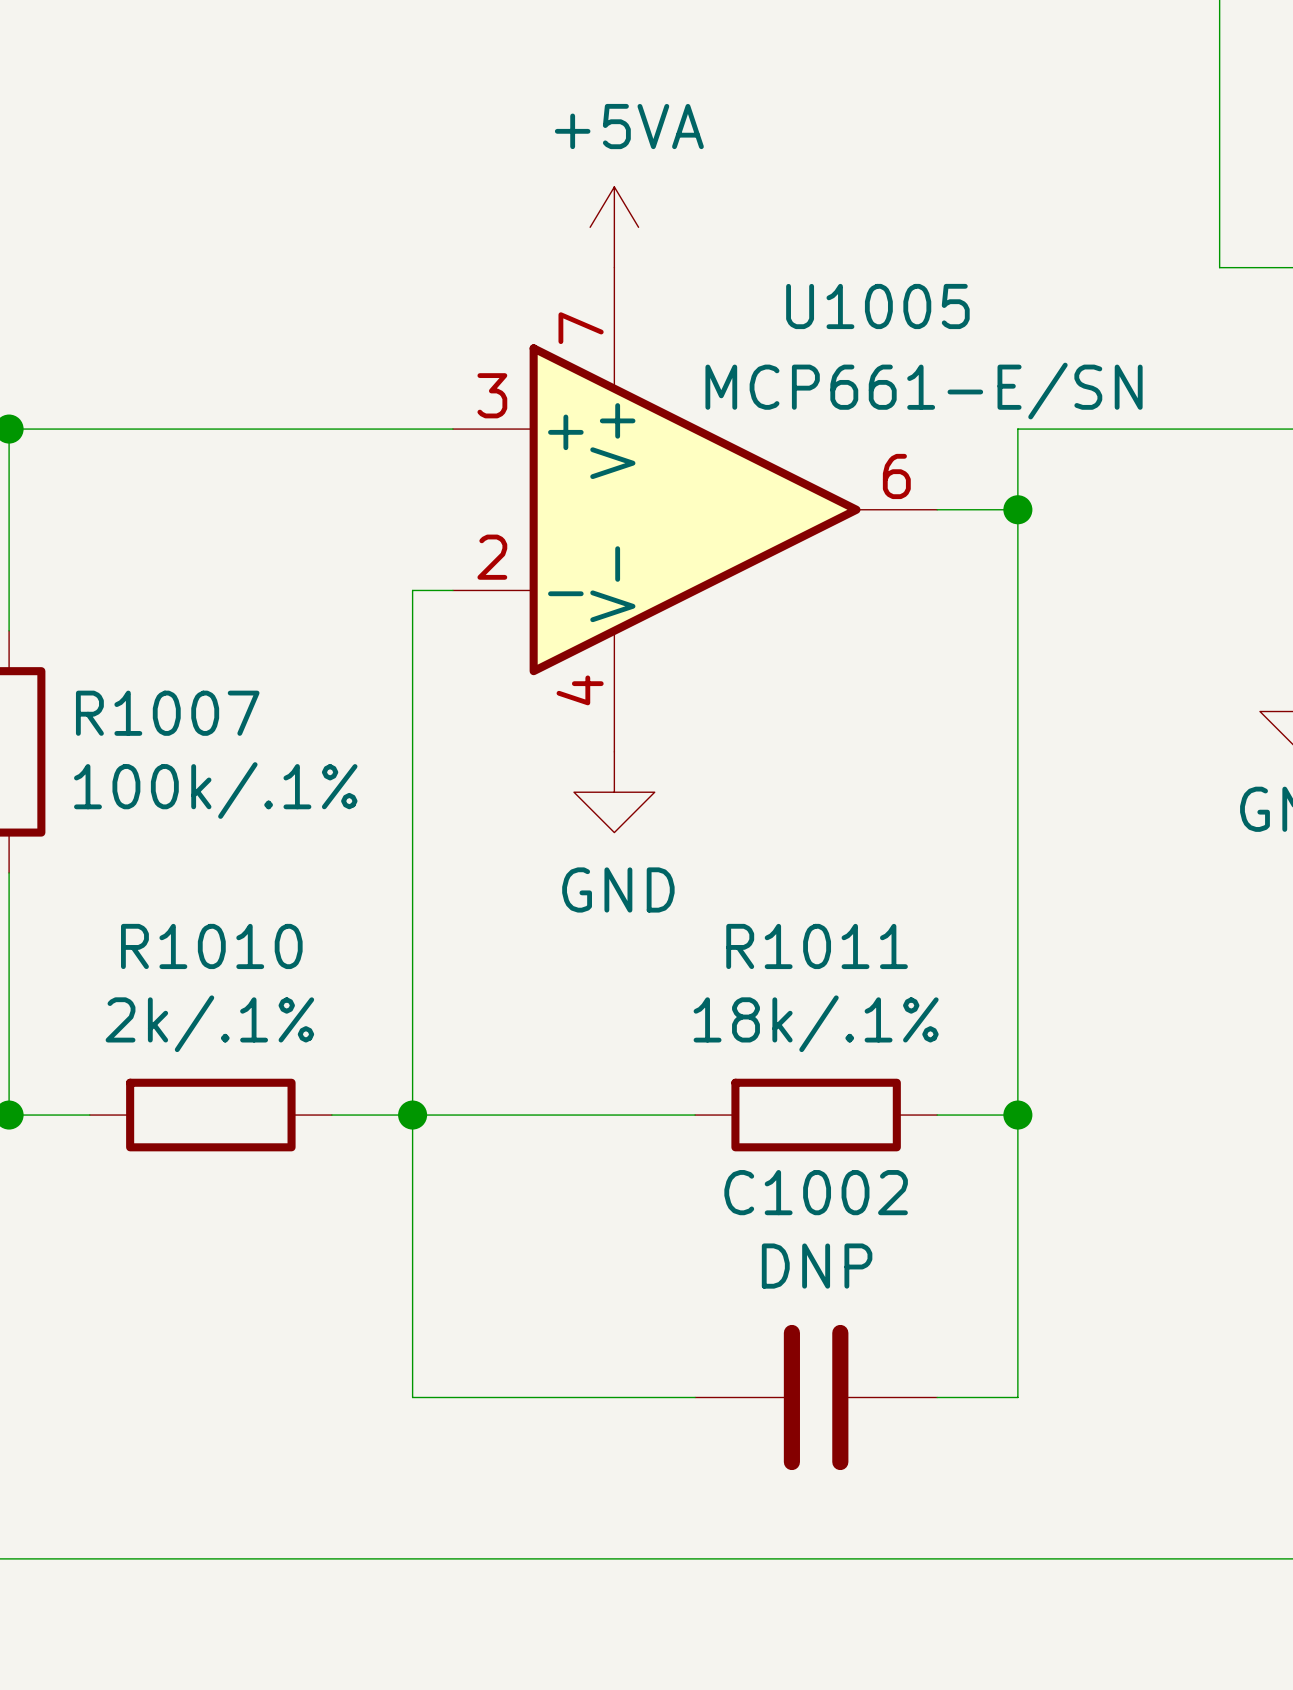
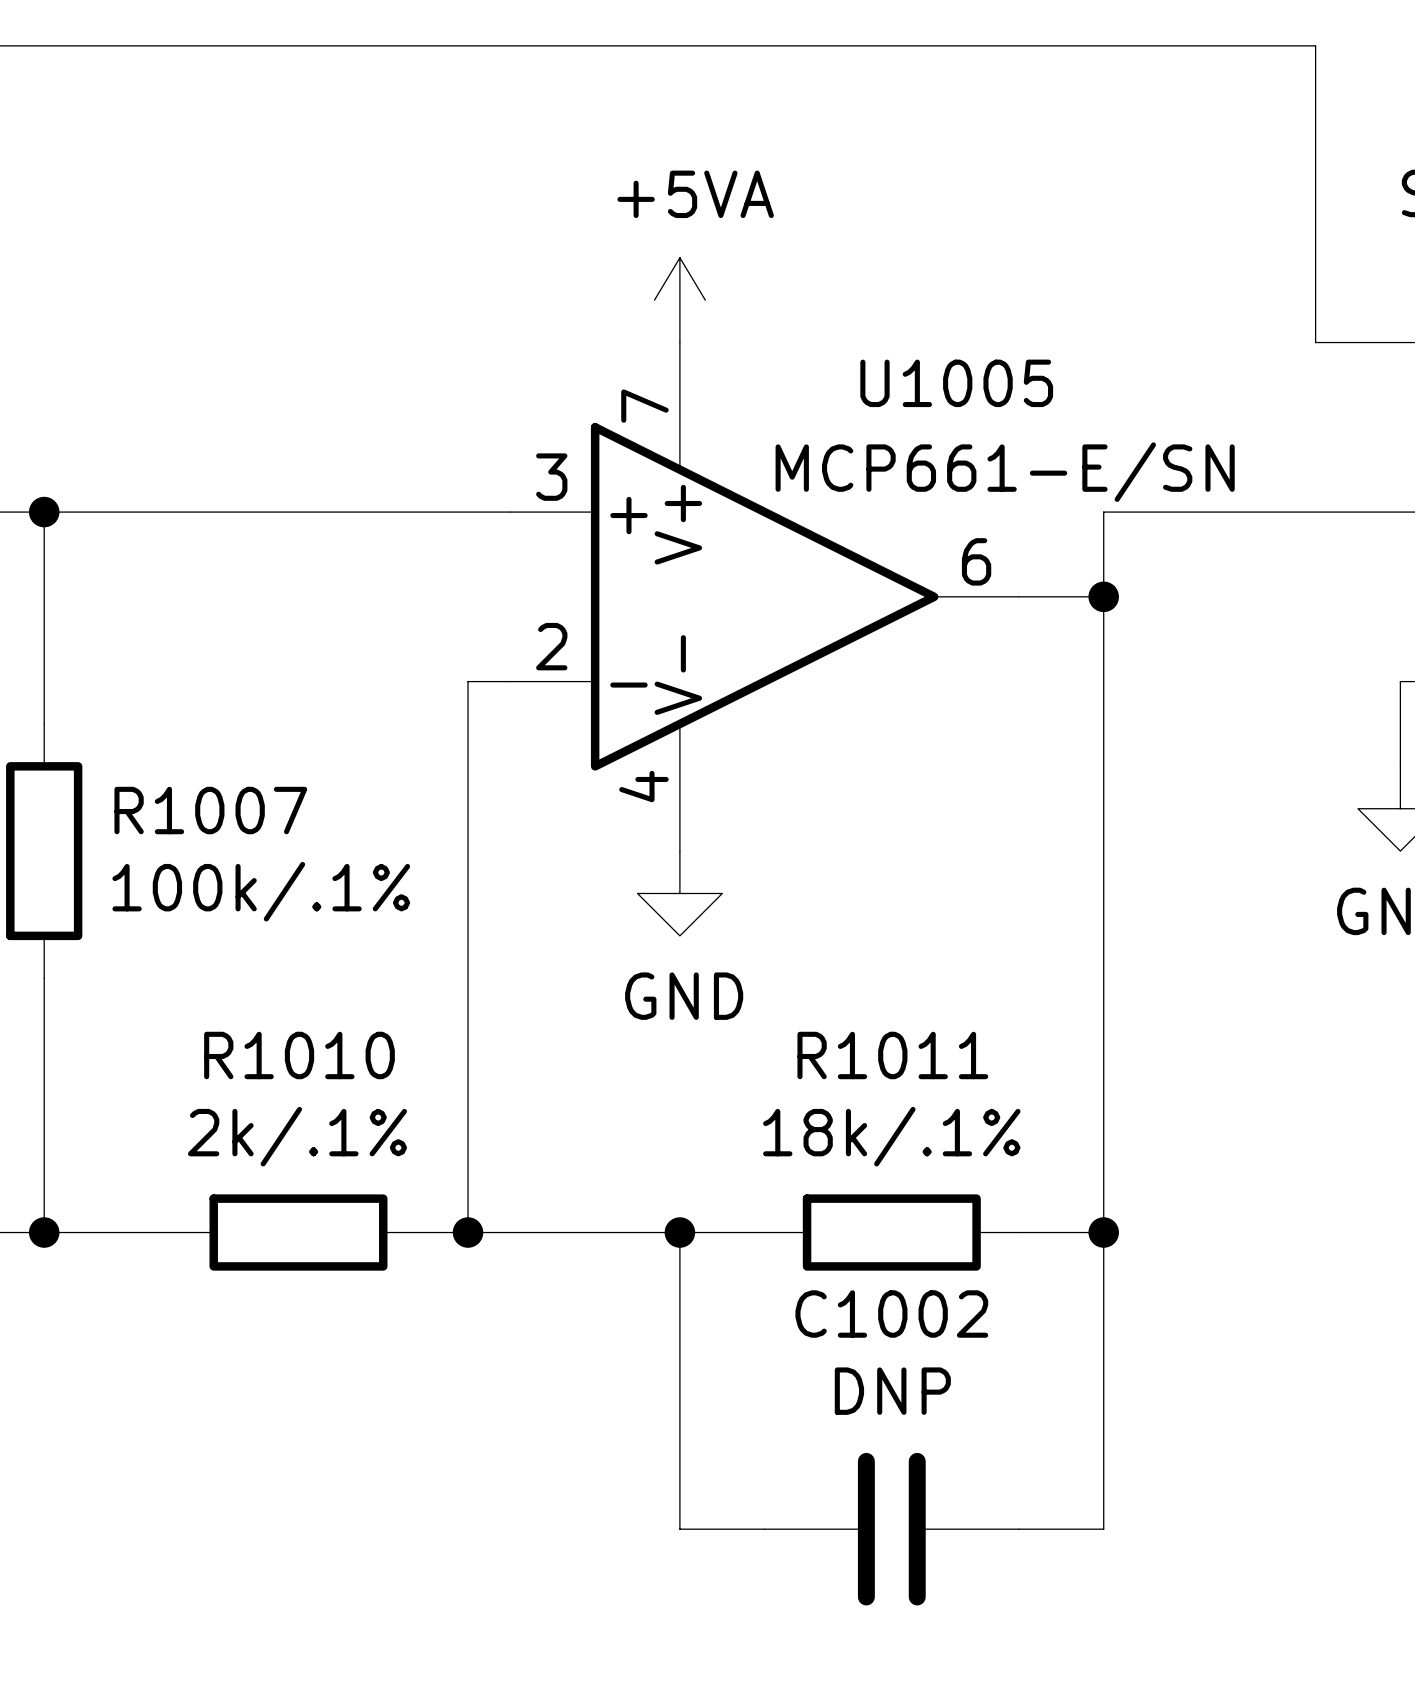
R1010 position: (210, 1115) -> (298, 1232)
wire: (412, 1115) (412, 1397) (614, 1397) -> (679, 1232) (679, 1529)
junction: none -> (679, 1232)

